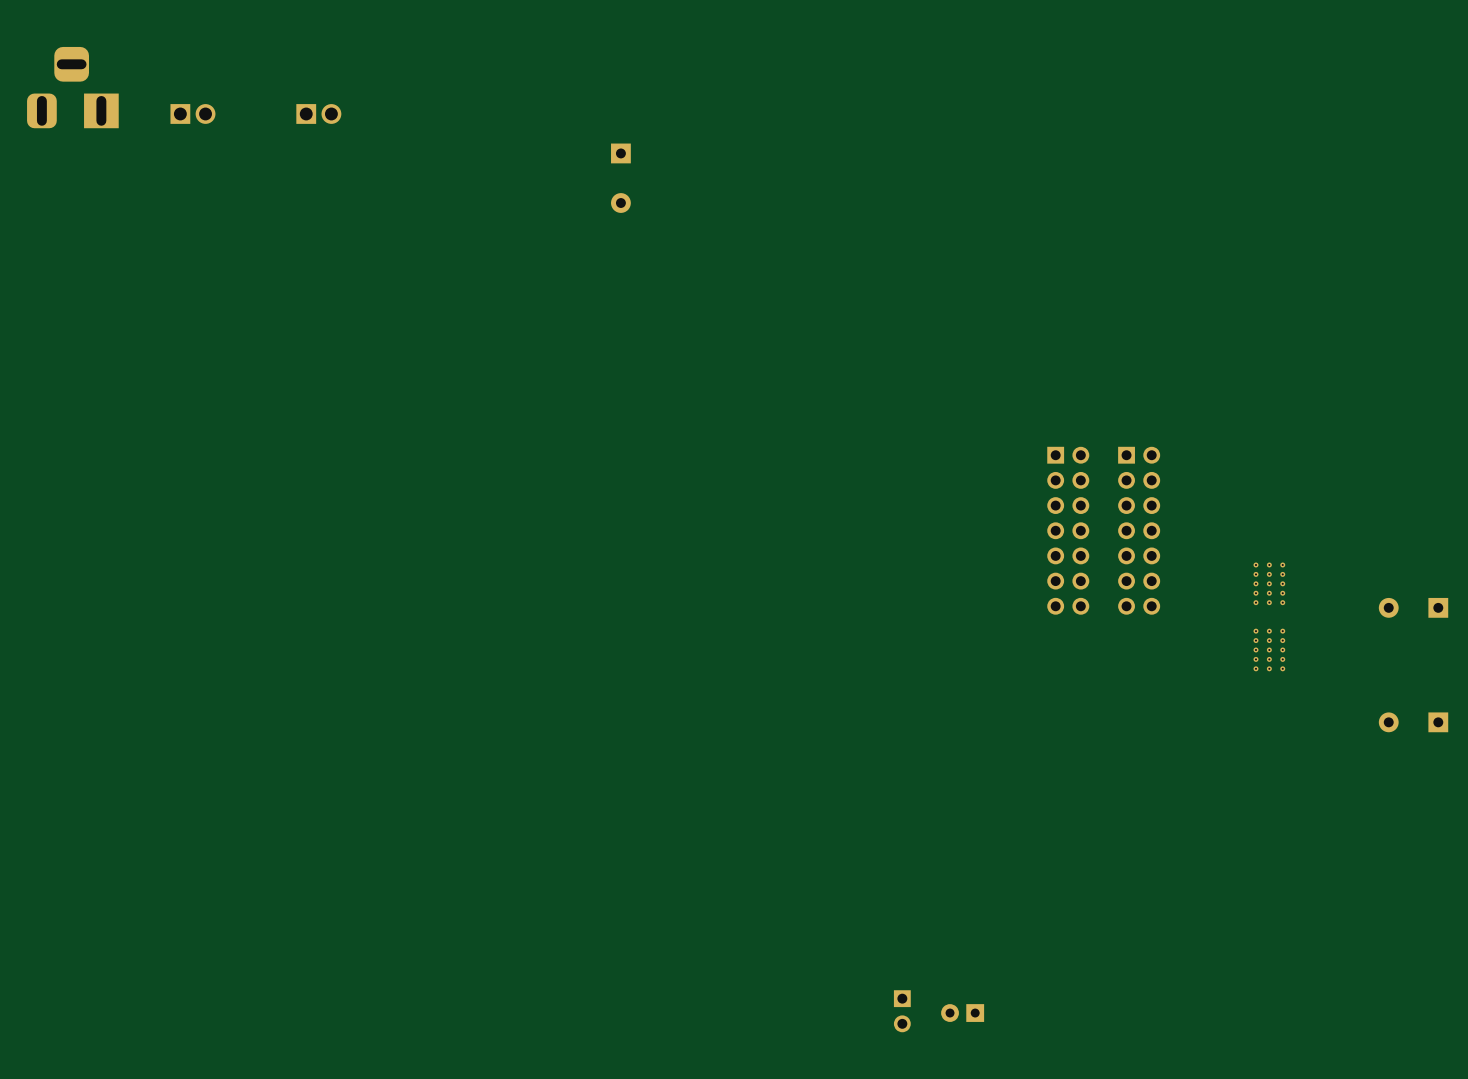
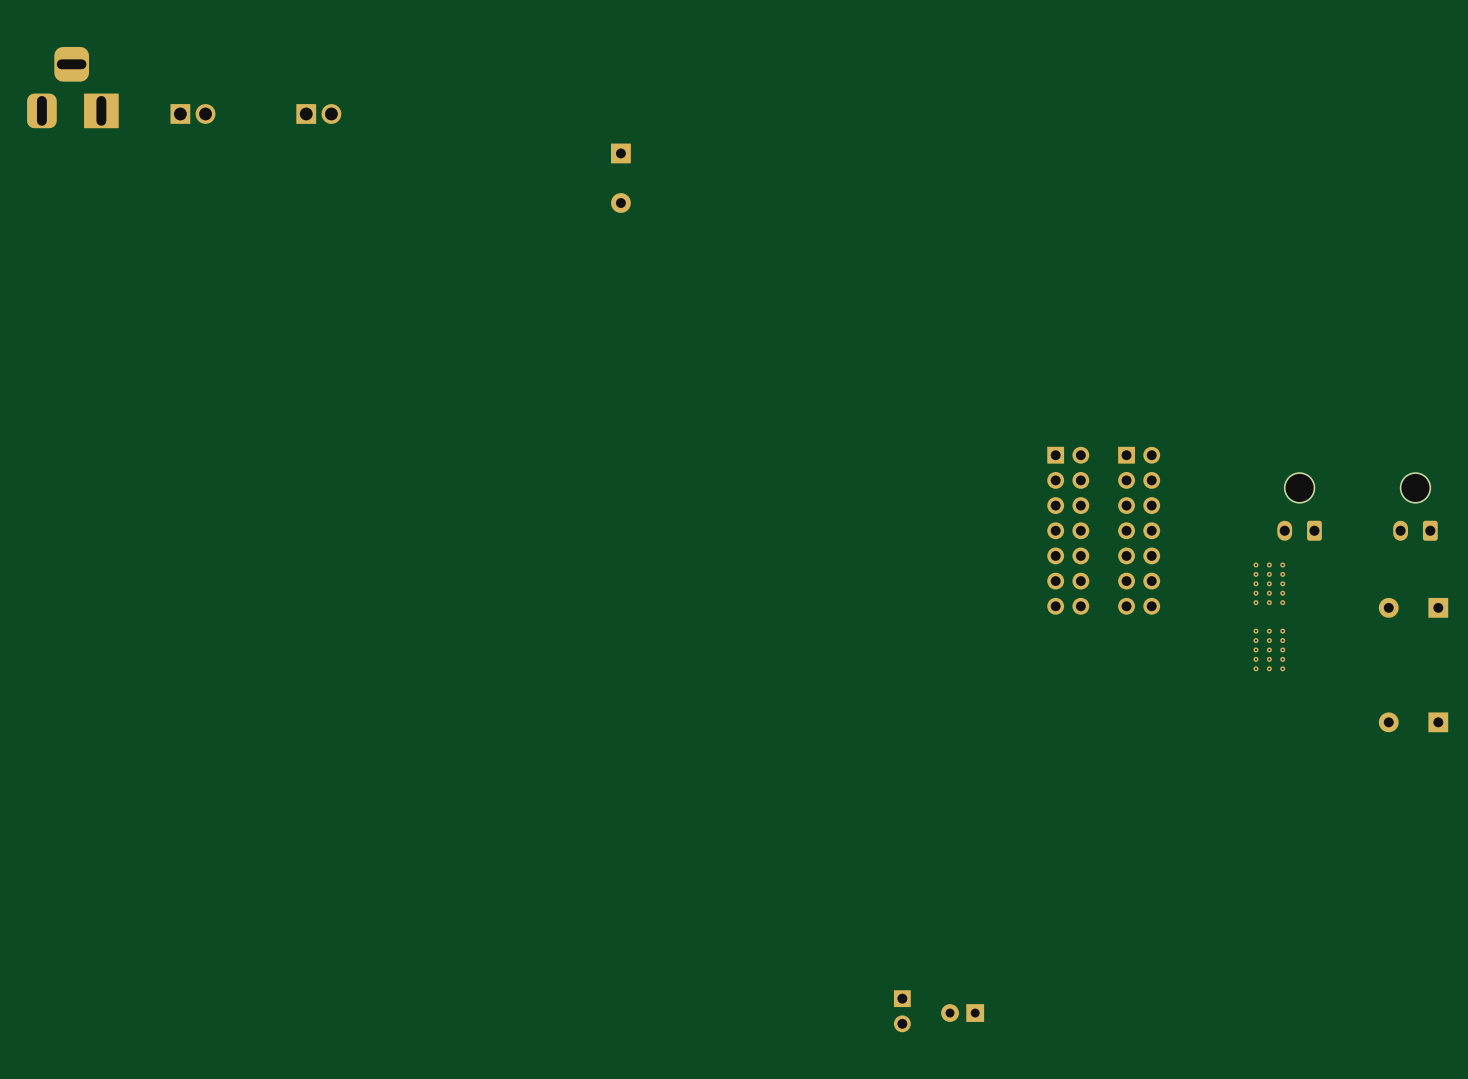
part: none -> (1299, 506)
part: none -> (1415, 506)

